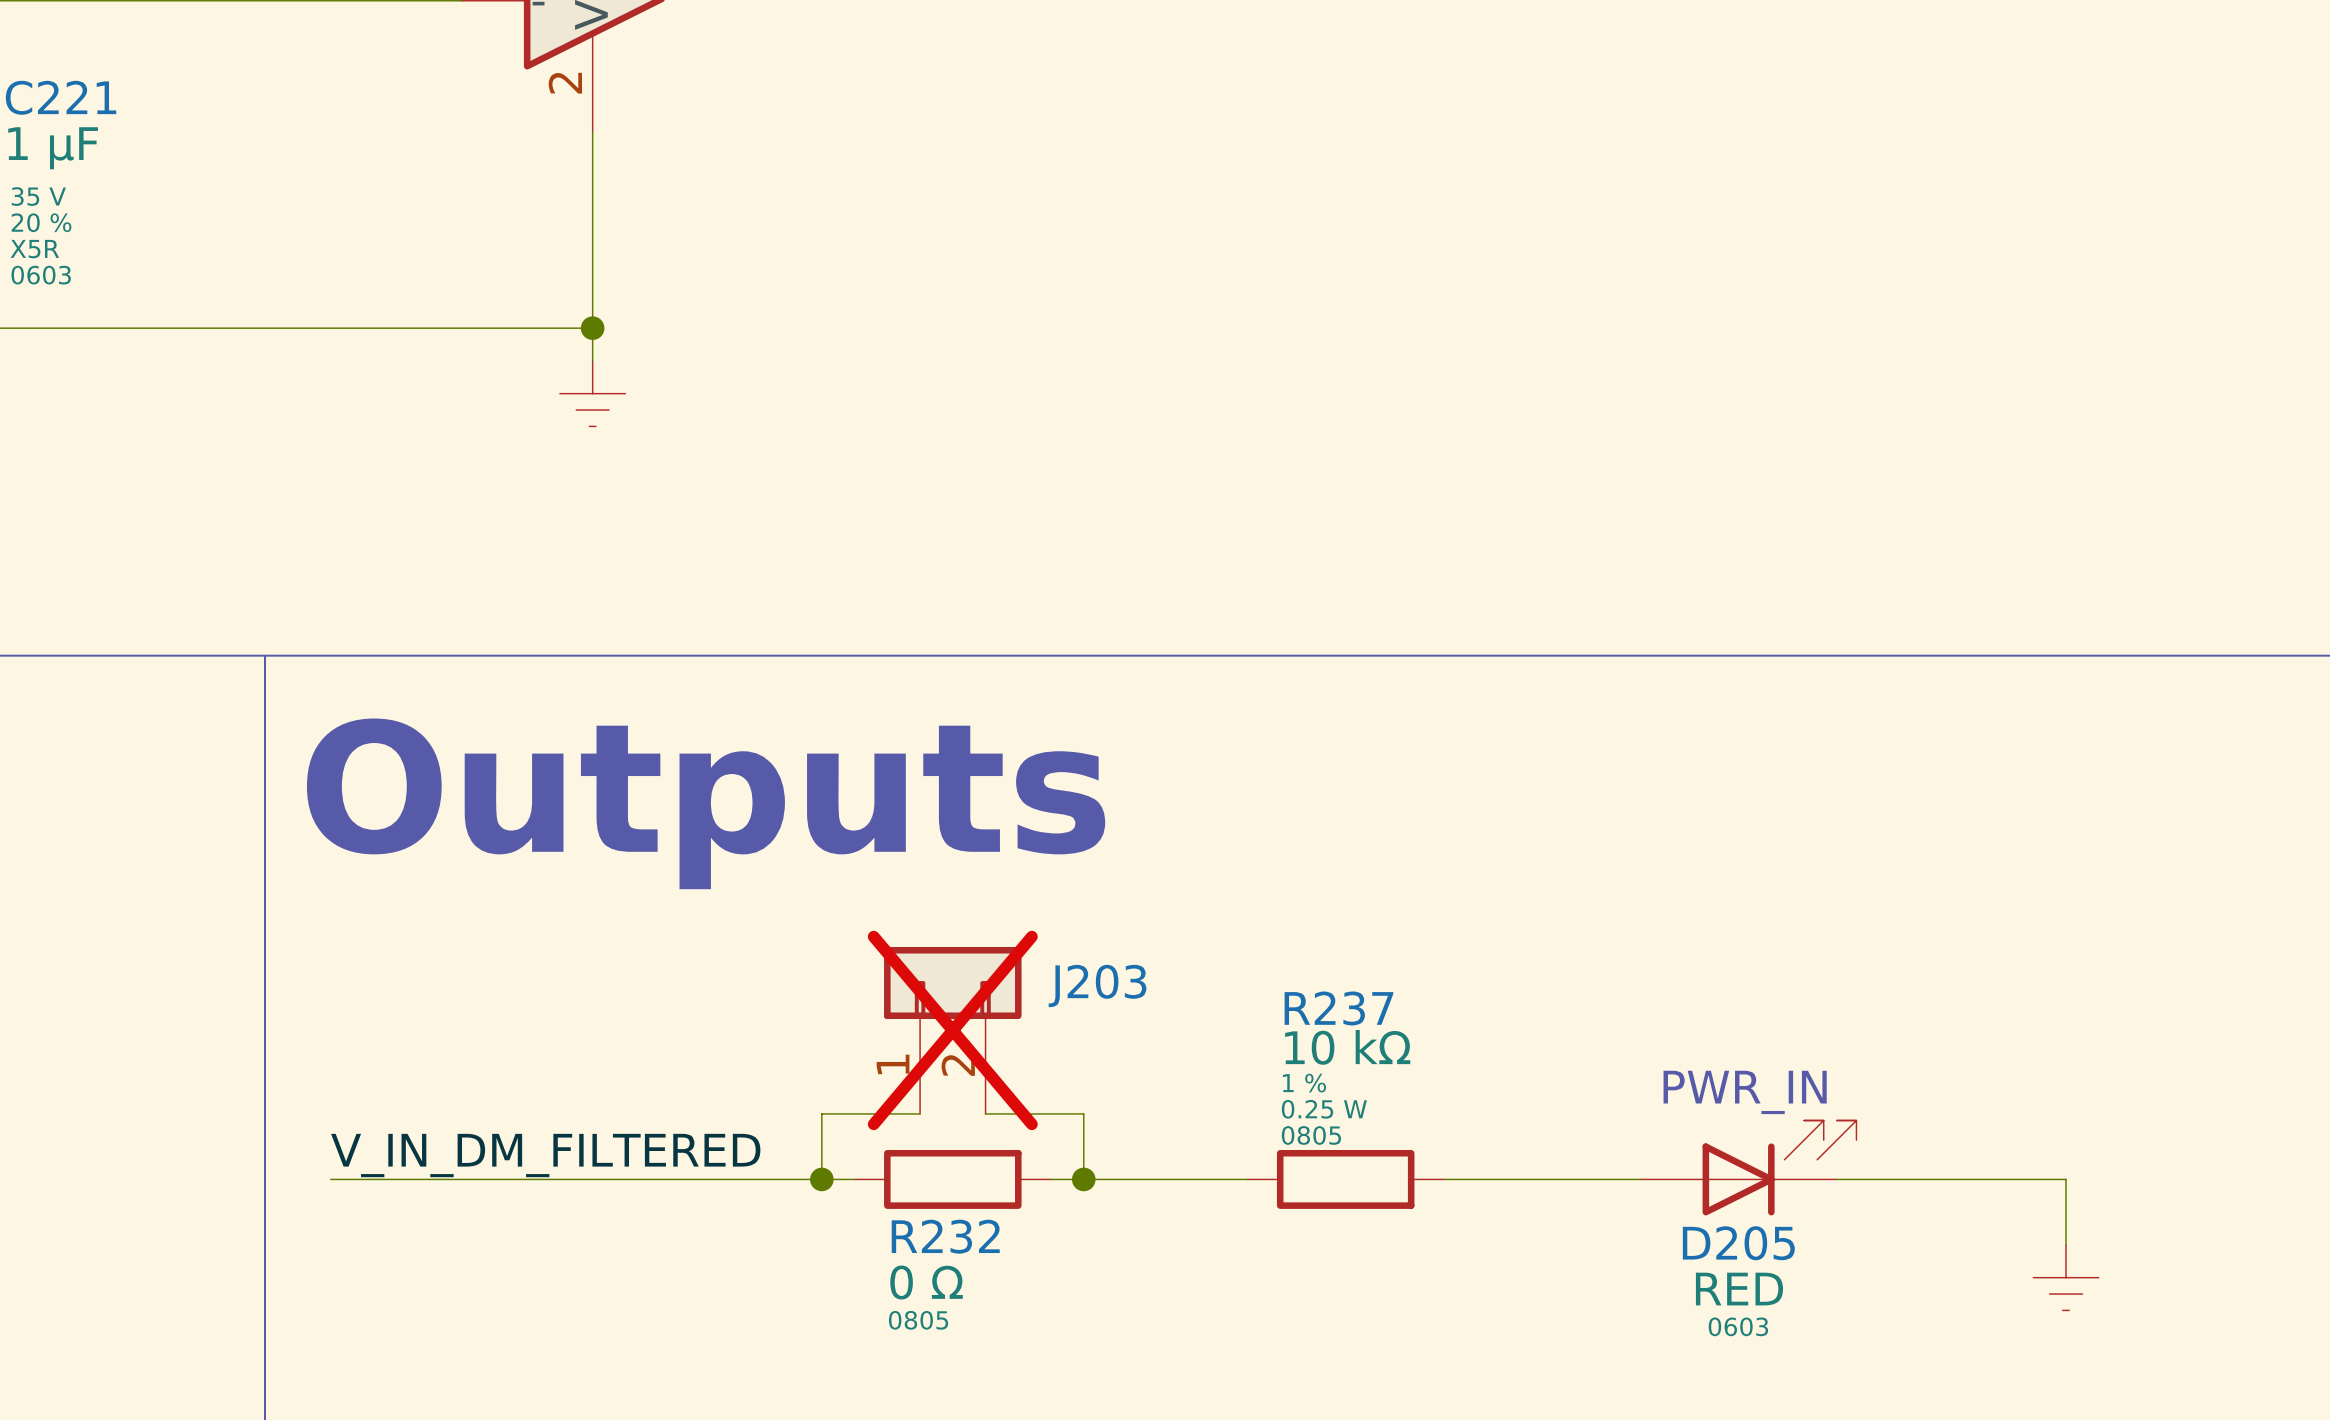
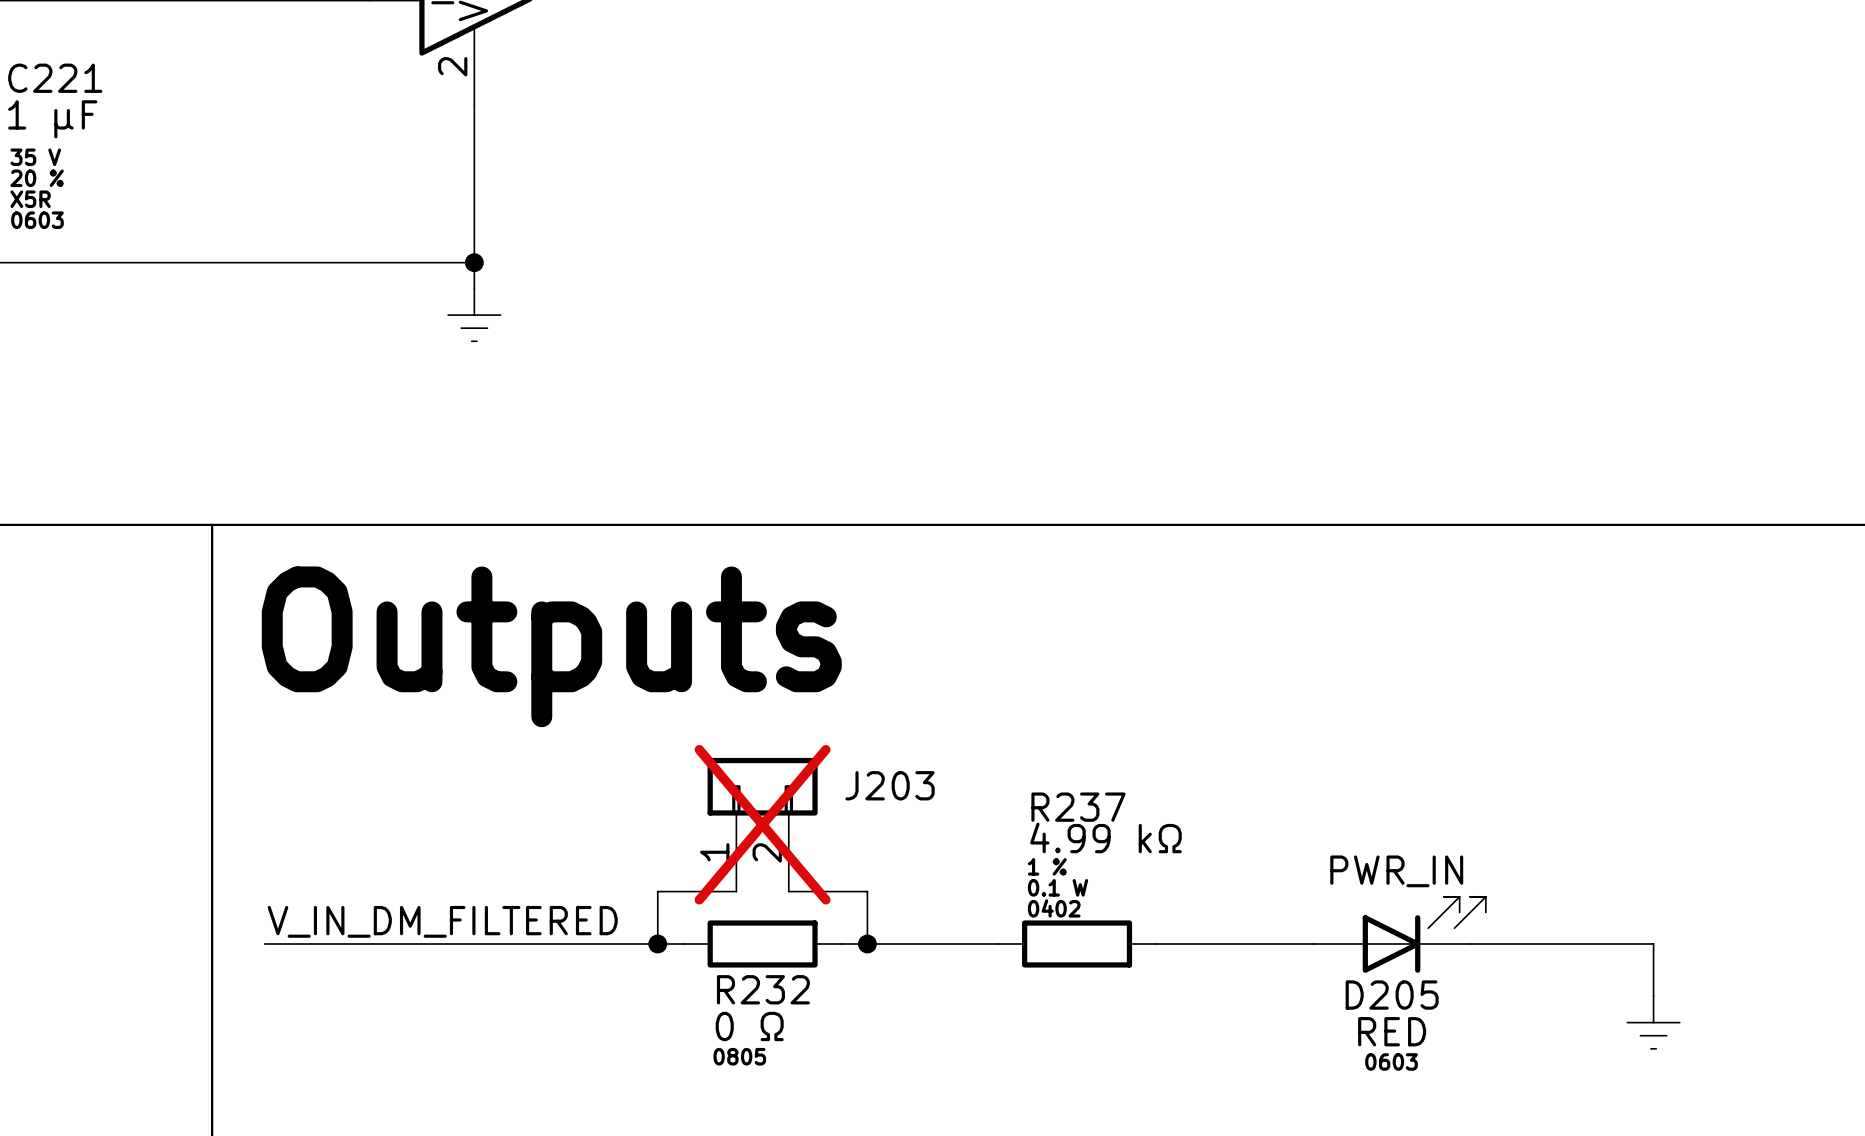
R237 value: 10 kΩ (1347, 1047) -> 4.99 kΩ (1105, 837)
R237 text: 0.25 W (1324, 1109) -> 0.1 W (1058, 887)
R237 text: 0805 (1311, 1135) -> 0402 (1054, 908)

